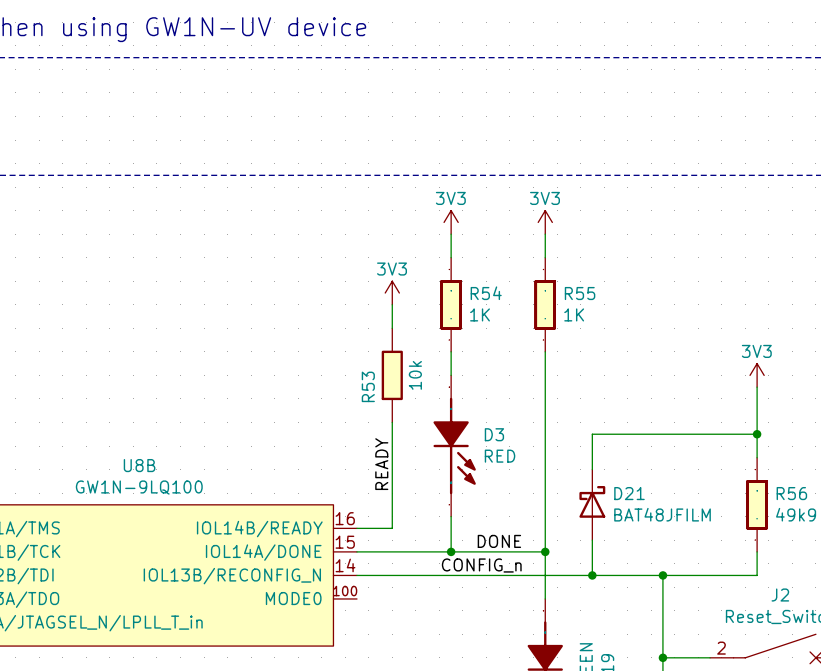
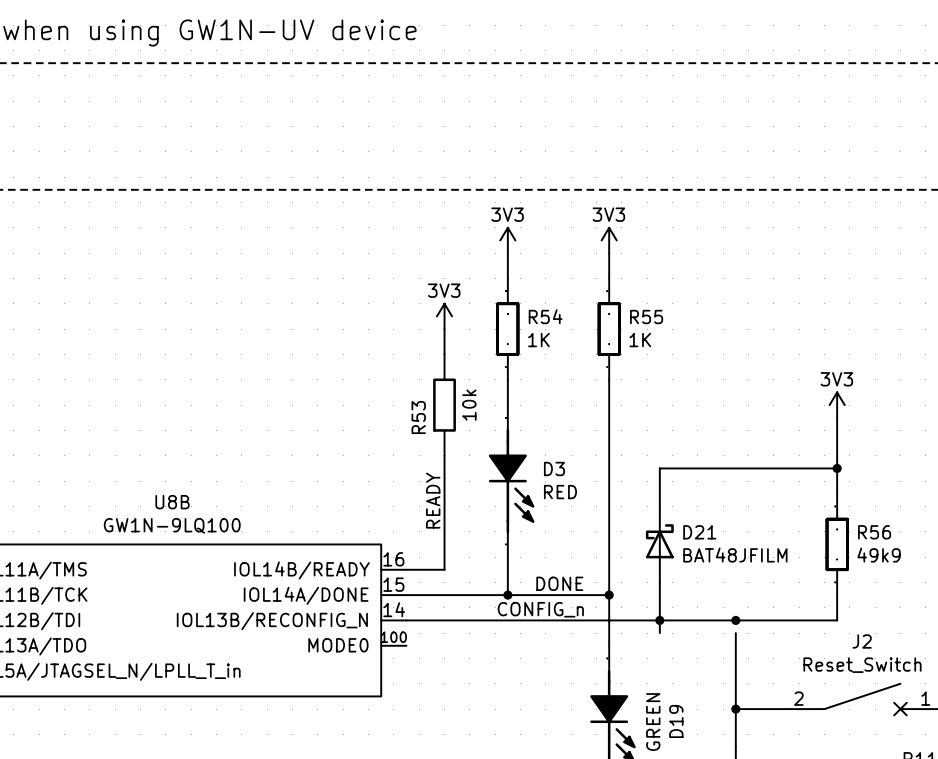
wire: (662, 575) (662, 587) -> (659, 620) (659, 633)

